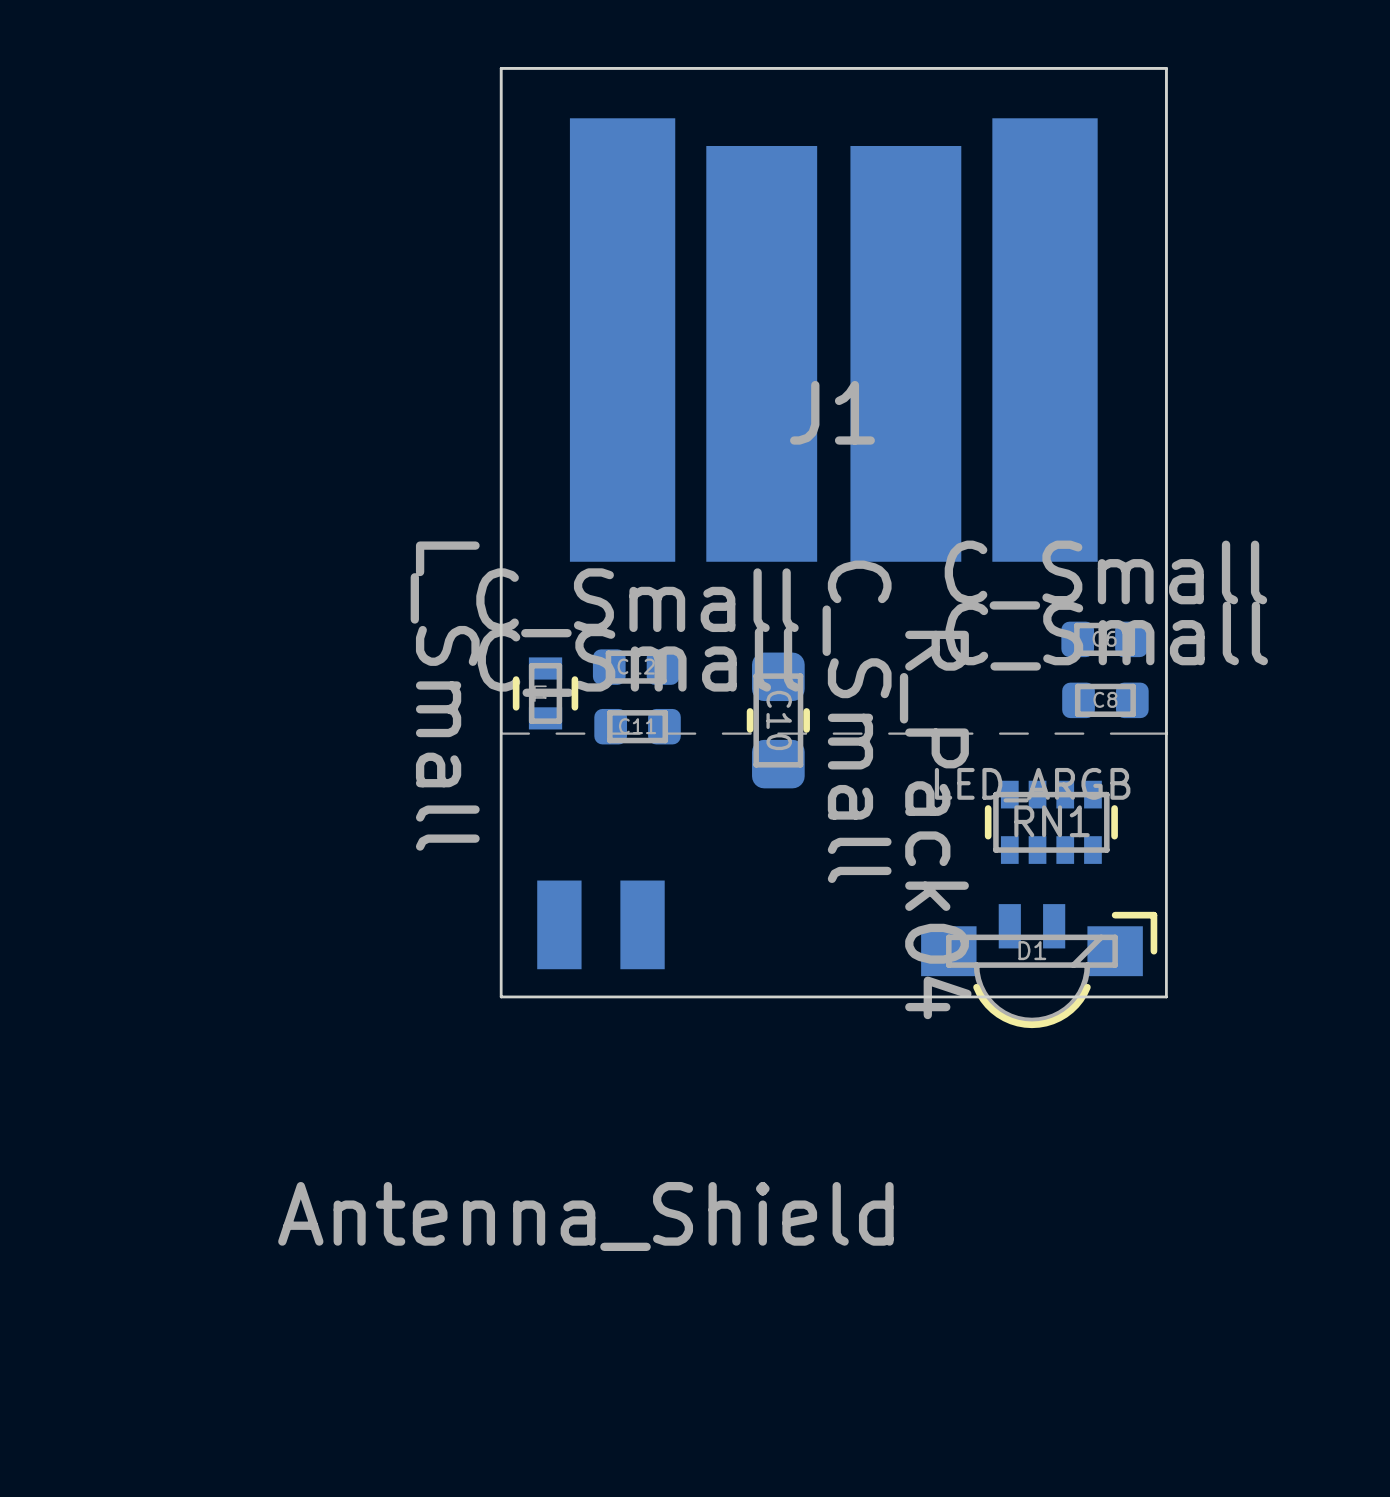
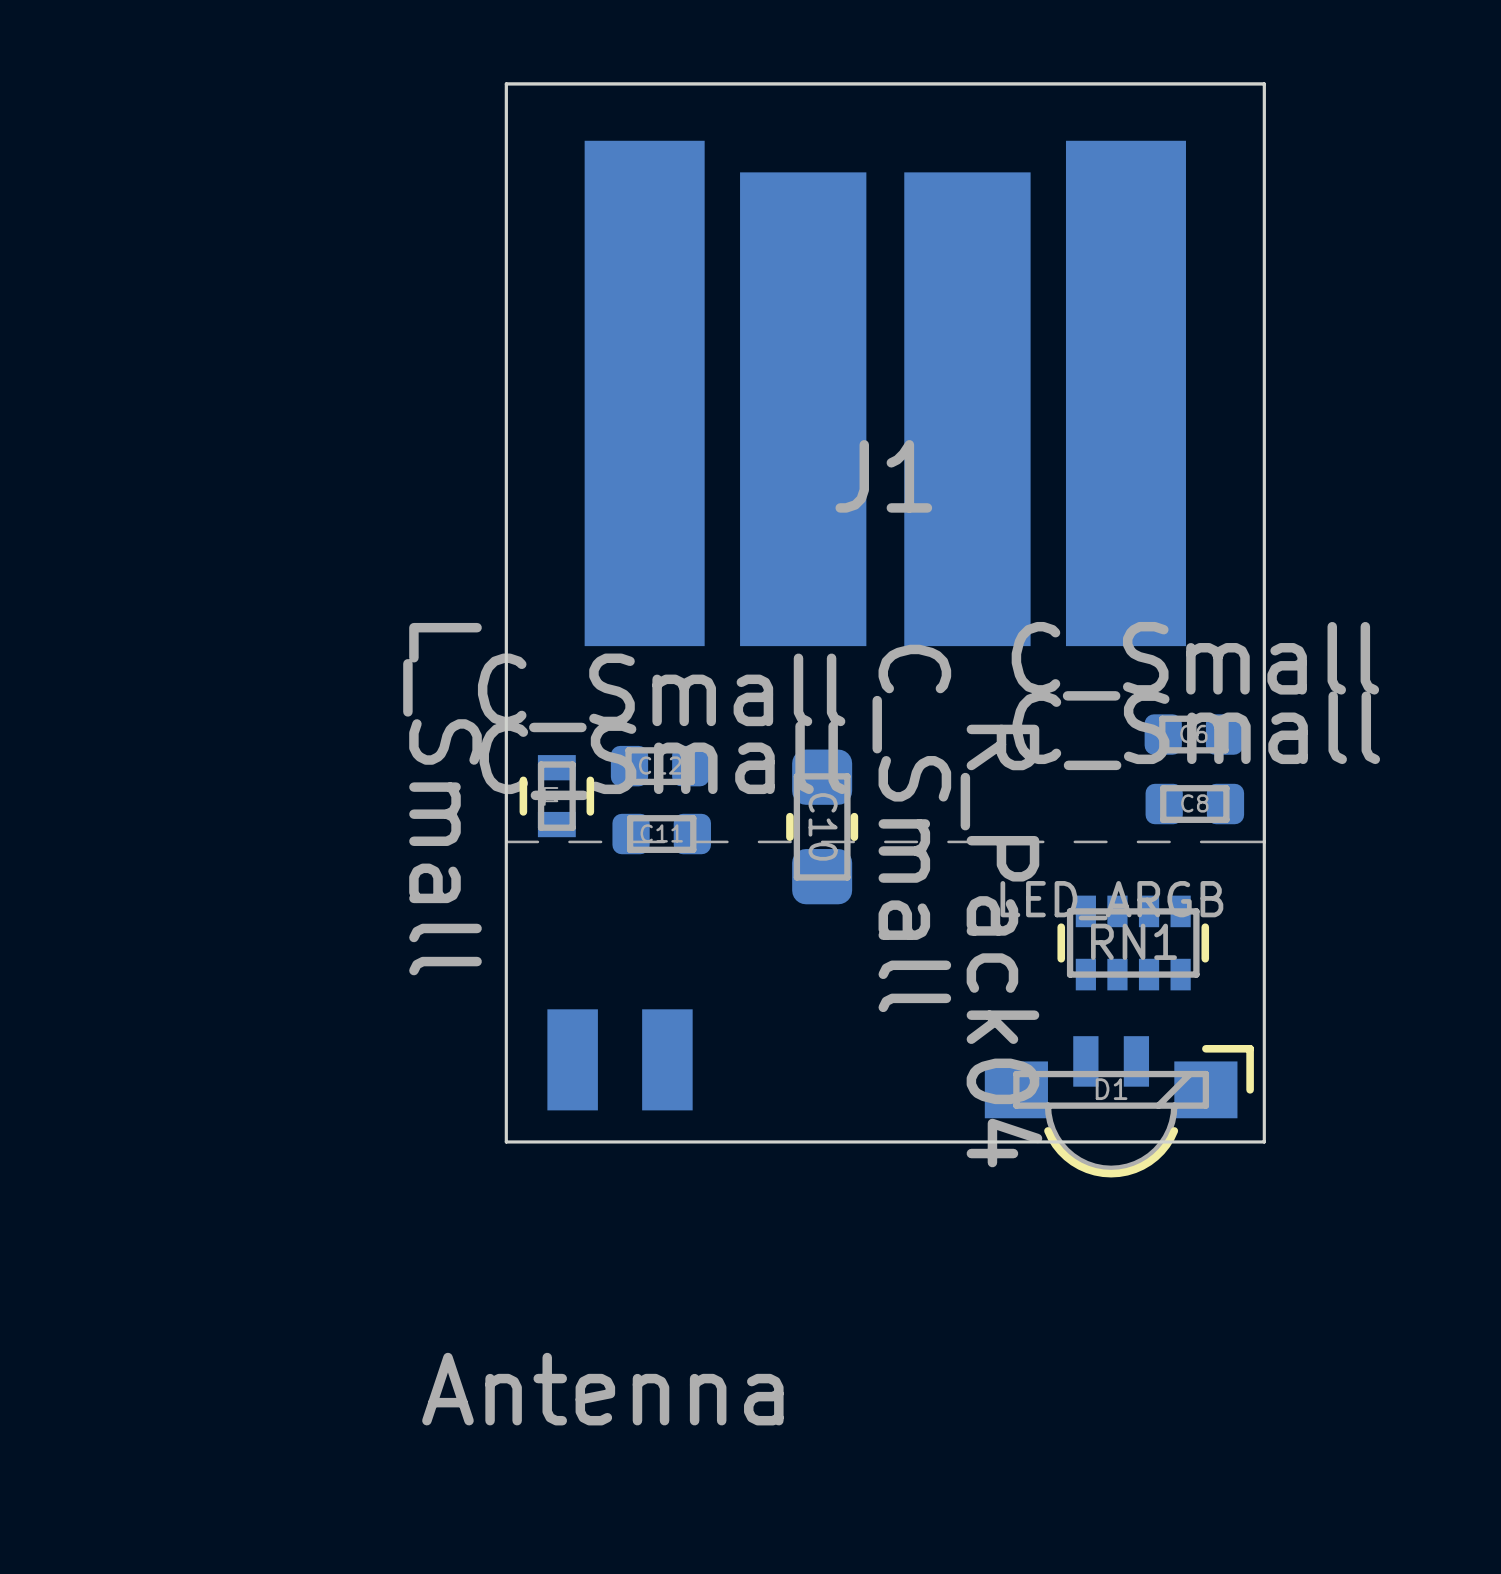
part value: Antenna_Shield (585, 1216) -> Antenna (602, 1389)

